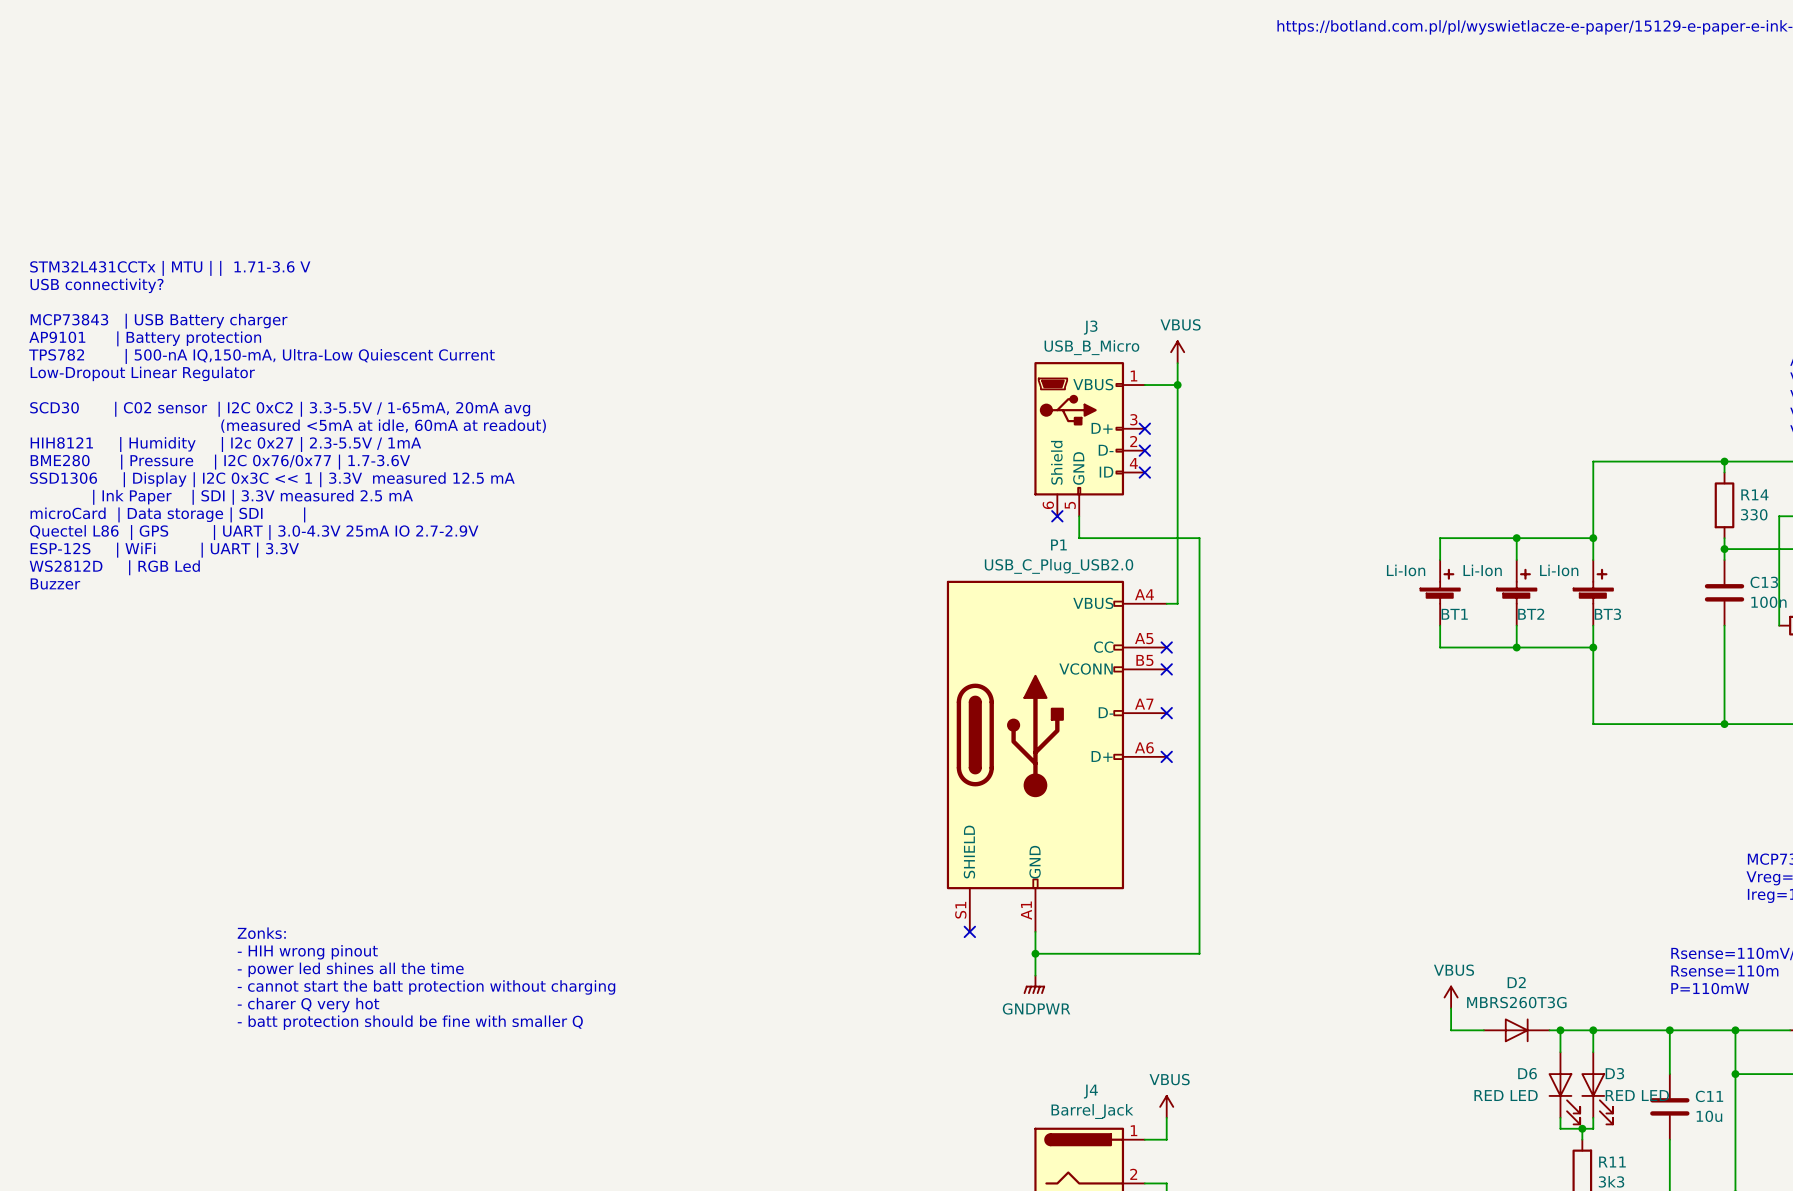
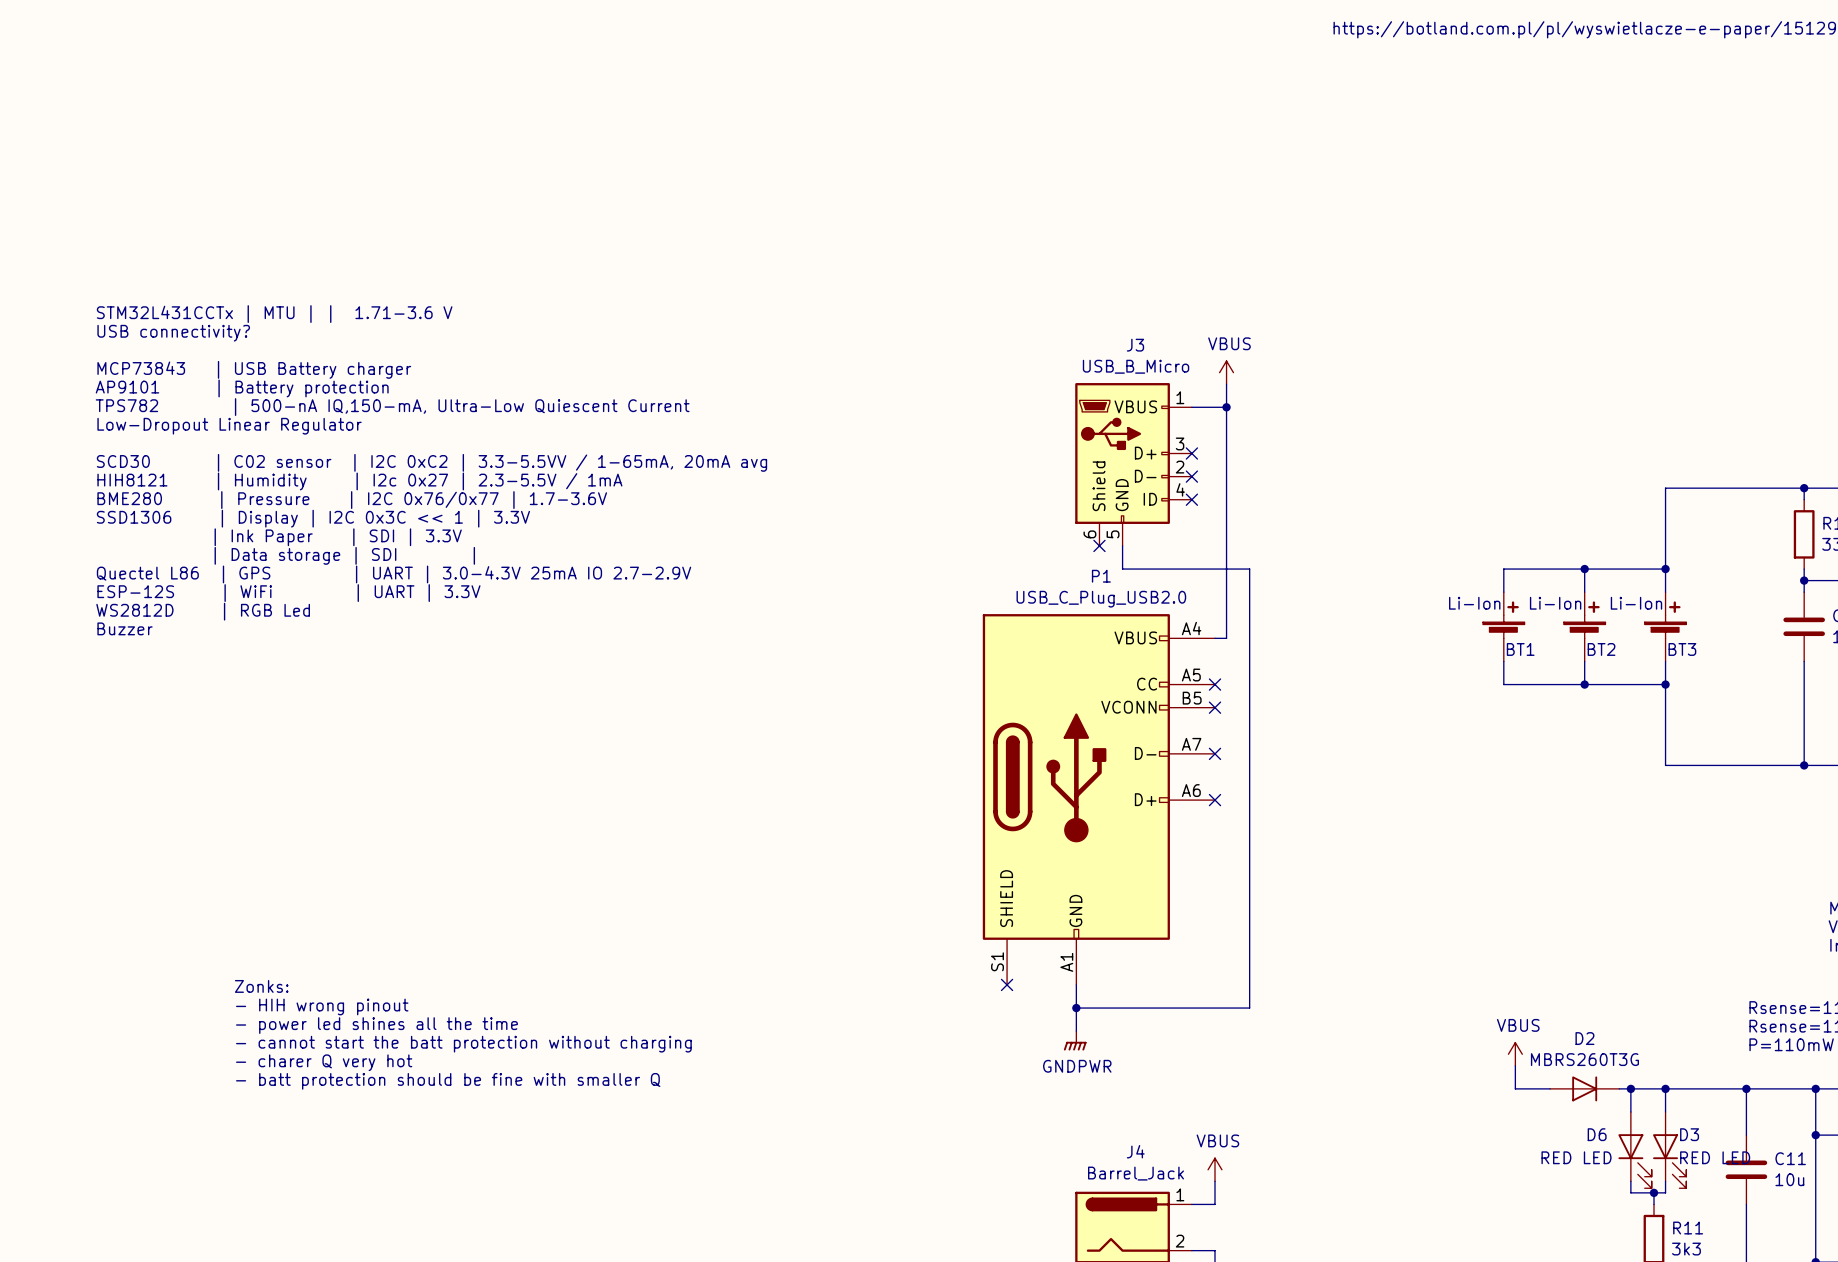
text position: STM32L431CCTx | MTU | | 1.71-3.6 V (170, 268) -> STM32L431CCTx | MTU | | 1.71-3.6 V (274, 314)
text position: USB connectivity? (96, 285) -> USB connectivity? (173, 333)
text position: MCP73843 | USB Battery charger (159, 321) -> MCP73843 | USB Battery charger (254, 369)
text position: AP9101 | Battery protection (145, 338) -> AP9101 | Battery protection (242, 388)
text position: TPS782 | 500-nA IQ,150-mA, Ultra-Low Quiescent Current (261, 356) -> TPS782 | 500-nA IQ,150-mA, Ultra-Low Quiescent Current (392, 407)
text position: Low-Dropout Linear Regulator (142, 373) -> Low-Dropout Linear Regulator (229, 426)
text: SCD30 | C02 sensor | I2C 0xC2 | 3.3-5.5V / 1-65mA, 20mA avg (280, 409) -> none
text: (measured <5mA at idle, 60mA at readout) (383, 426) -> none
text: none -> SCD30 | C02 sensor | I2C 0xC2 | 3.3-5.5VV / 1-65mA, 20mA avg (431, 462)
text position: HIH8121 | Humidity | I2c 0x27 | 2.3-5.5V / 1mA (225, 444) -> HIH8121 | Humidity | I2c 0x27 | 2.3-5.5V / 1mA (359, 481)
text position: BME280 | Pressure | I2C 0x76/0x77 | 1.7-3.6V (220, 462) -> BME280 | Pressure | I2C 0x76/0x77 | 1.7-3.6V (352, 500)
text: SSD1306 | Display | I2C 0x3C << 1 | 3.3V measured 12.5 mA (272, 479) -> SSD1306 | Display | I2C 0x3C << 1 | 3.3V (313, 518)
text: | Ink Paper | SDI | 3.3V measured 2.5 mA (253, 497) -> | Ink Paper | SDI | 3.3V (338, 537)
text: microCard | Data storage | SDI | (167, 514) -> | Data storage | SDI | (344, 555)
text position: Quectel L86 | GPS | UART | 3.0-4.3V 25mA IO 2.7-2.9V (254, 532) -> Quectel L86 | GPS | UART | 3.0-4.3V 25mA IO 2.7-2.9V (394, 574)
text position: ESP-12S | WiFi | UART | 3.3V (164, 550) -> ESP-12S | WiFi | UART | 3.3V (288, 593)
text position: WS2812D | RGB Led (114, 567) -> WS2812D | RGB Led (203, 611)
text position: Buzzer (55, 583) -> Buzzer (125, 628)

